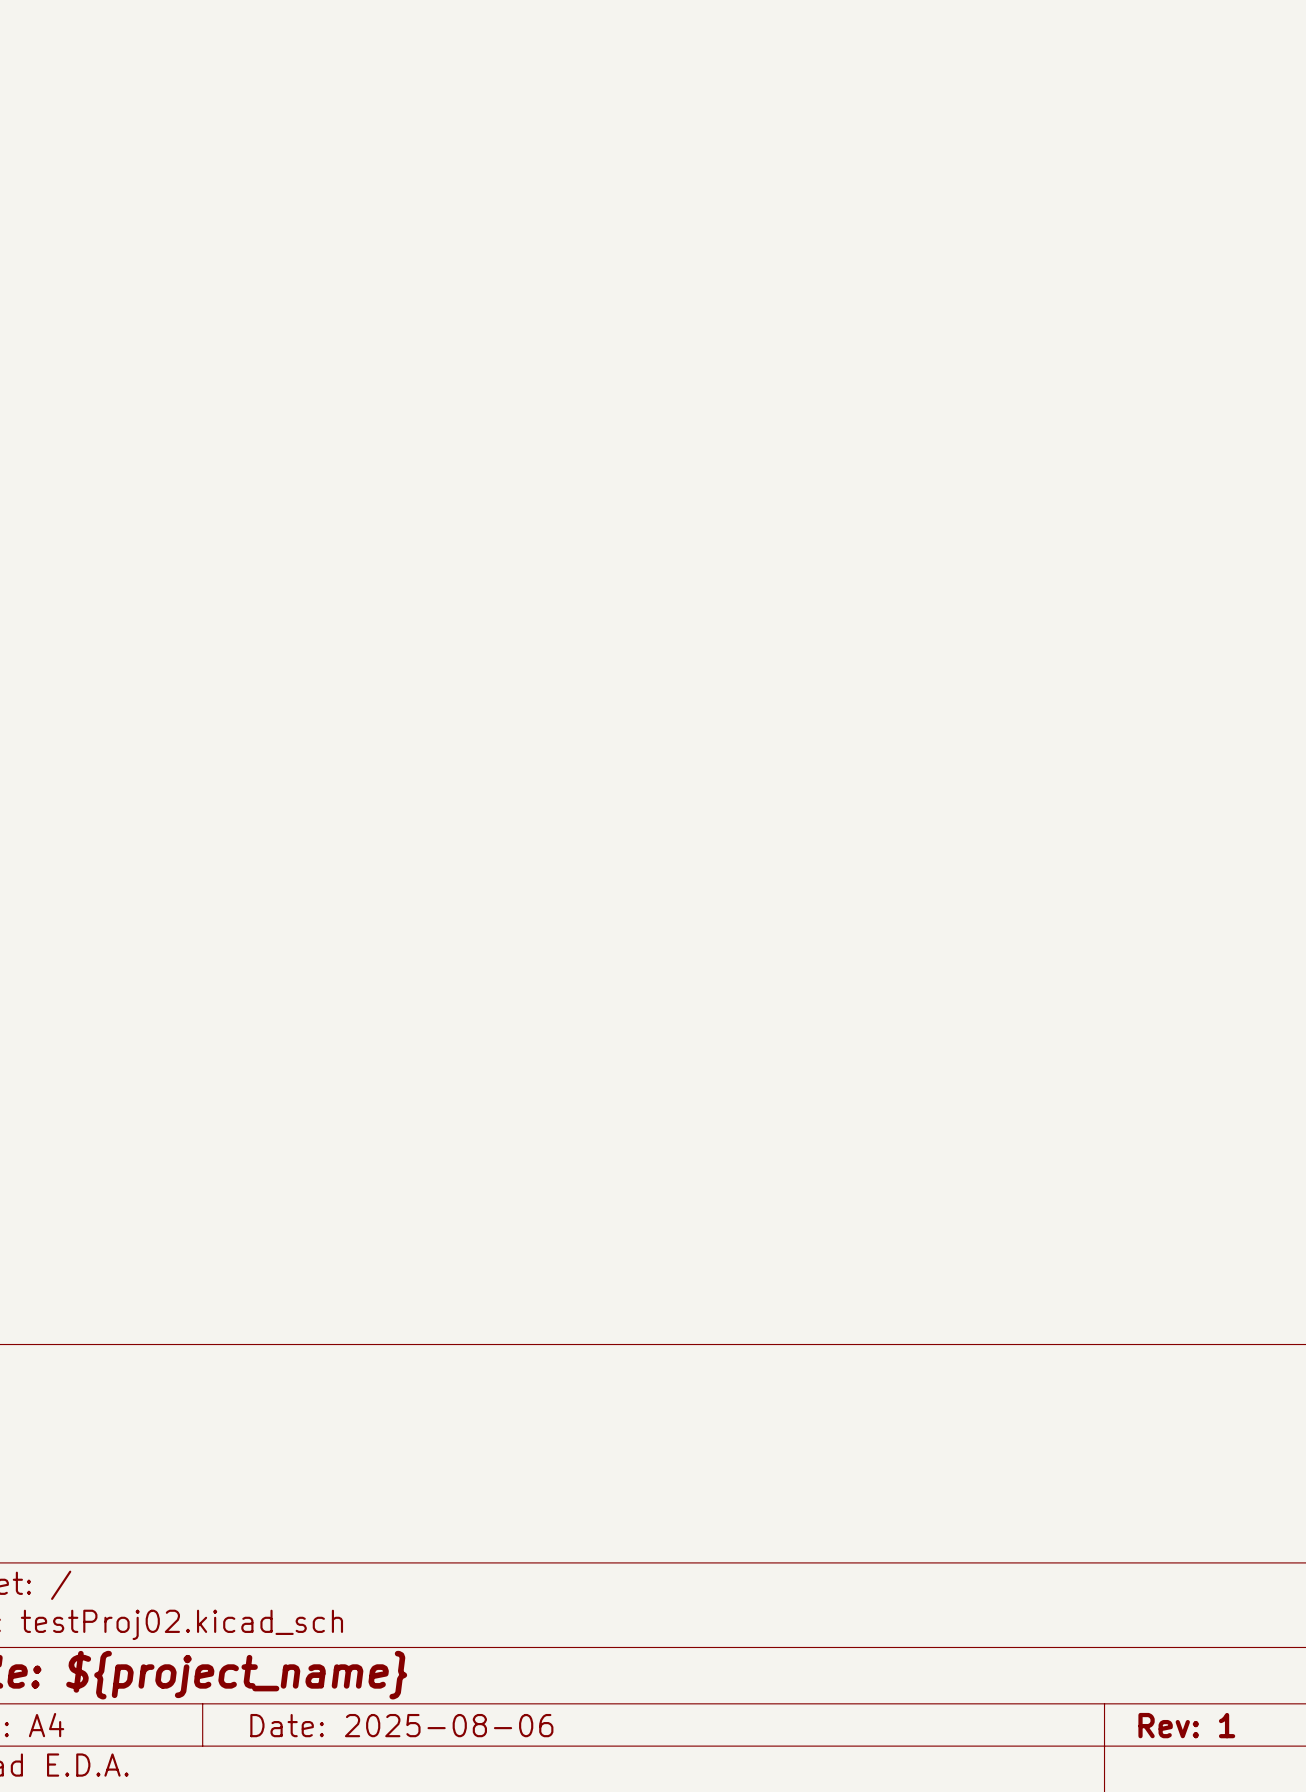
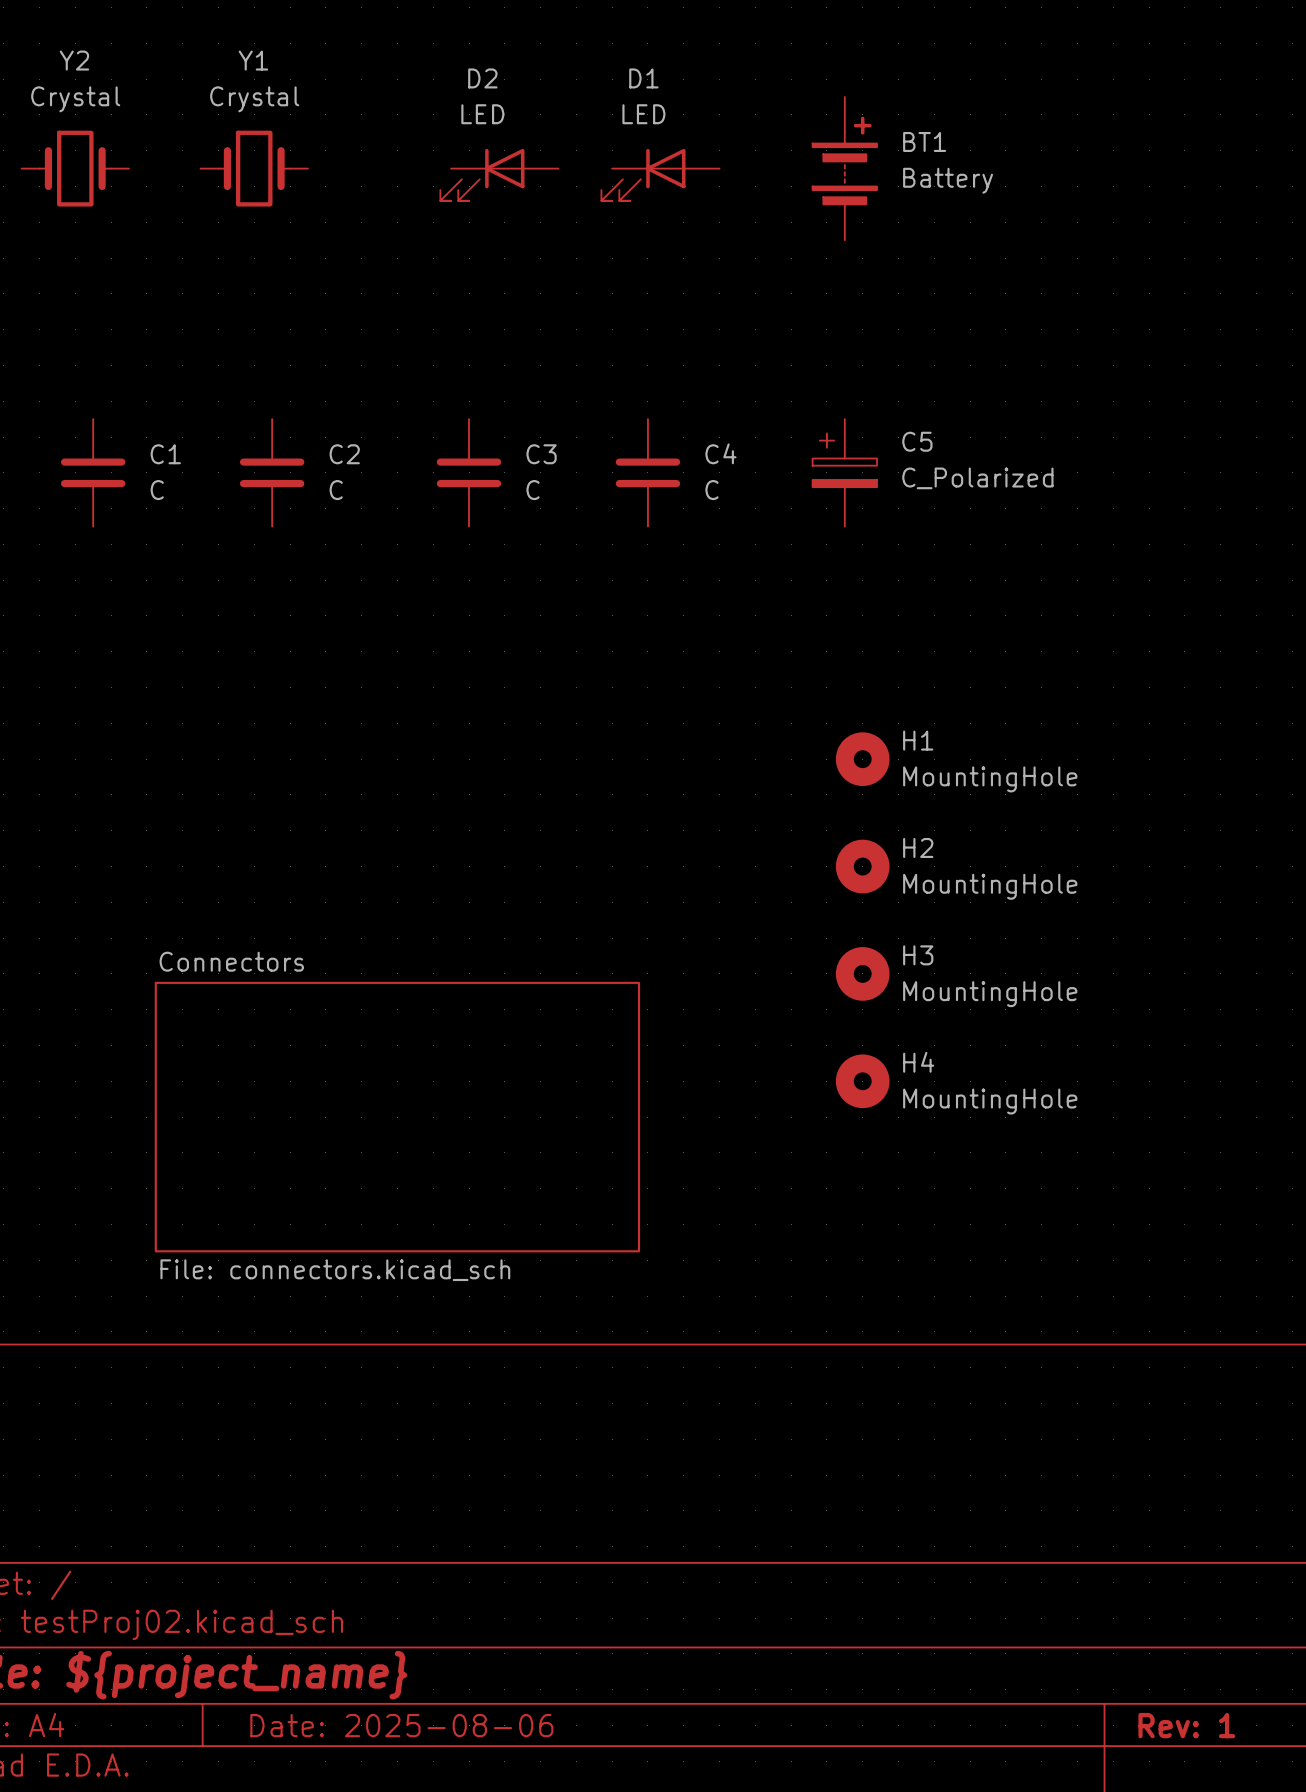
Y2: none -> Crystal (75, 168)
Y1: none -> Crystal (254, 168)
BT1: none -> Battery (844, 168)
D2: none -> LED (499, 174)
D1: none -> LED (660, 174)
C1: none -> C (93, 472)
C2: none -> C (272, 472)
C3: none -> C (469, 472)
C4: none -> C (647, 472)
C5: none -> C_Polarized (844, 472)
H1: none -> MountingHole (862, 759)
H2: none -> MountingHole (862, 866)
H3: none -> MountingHole (862, 973)
H4: none -> MountingHole (862, 1081)
sheet Connectors: none -> File: connectors.kicad_sch (397, 1117)

